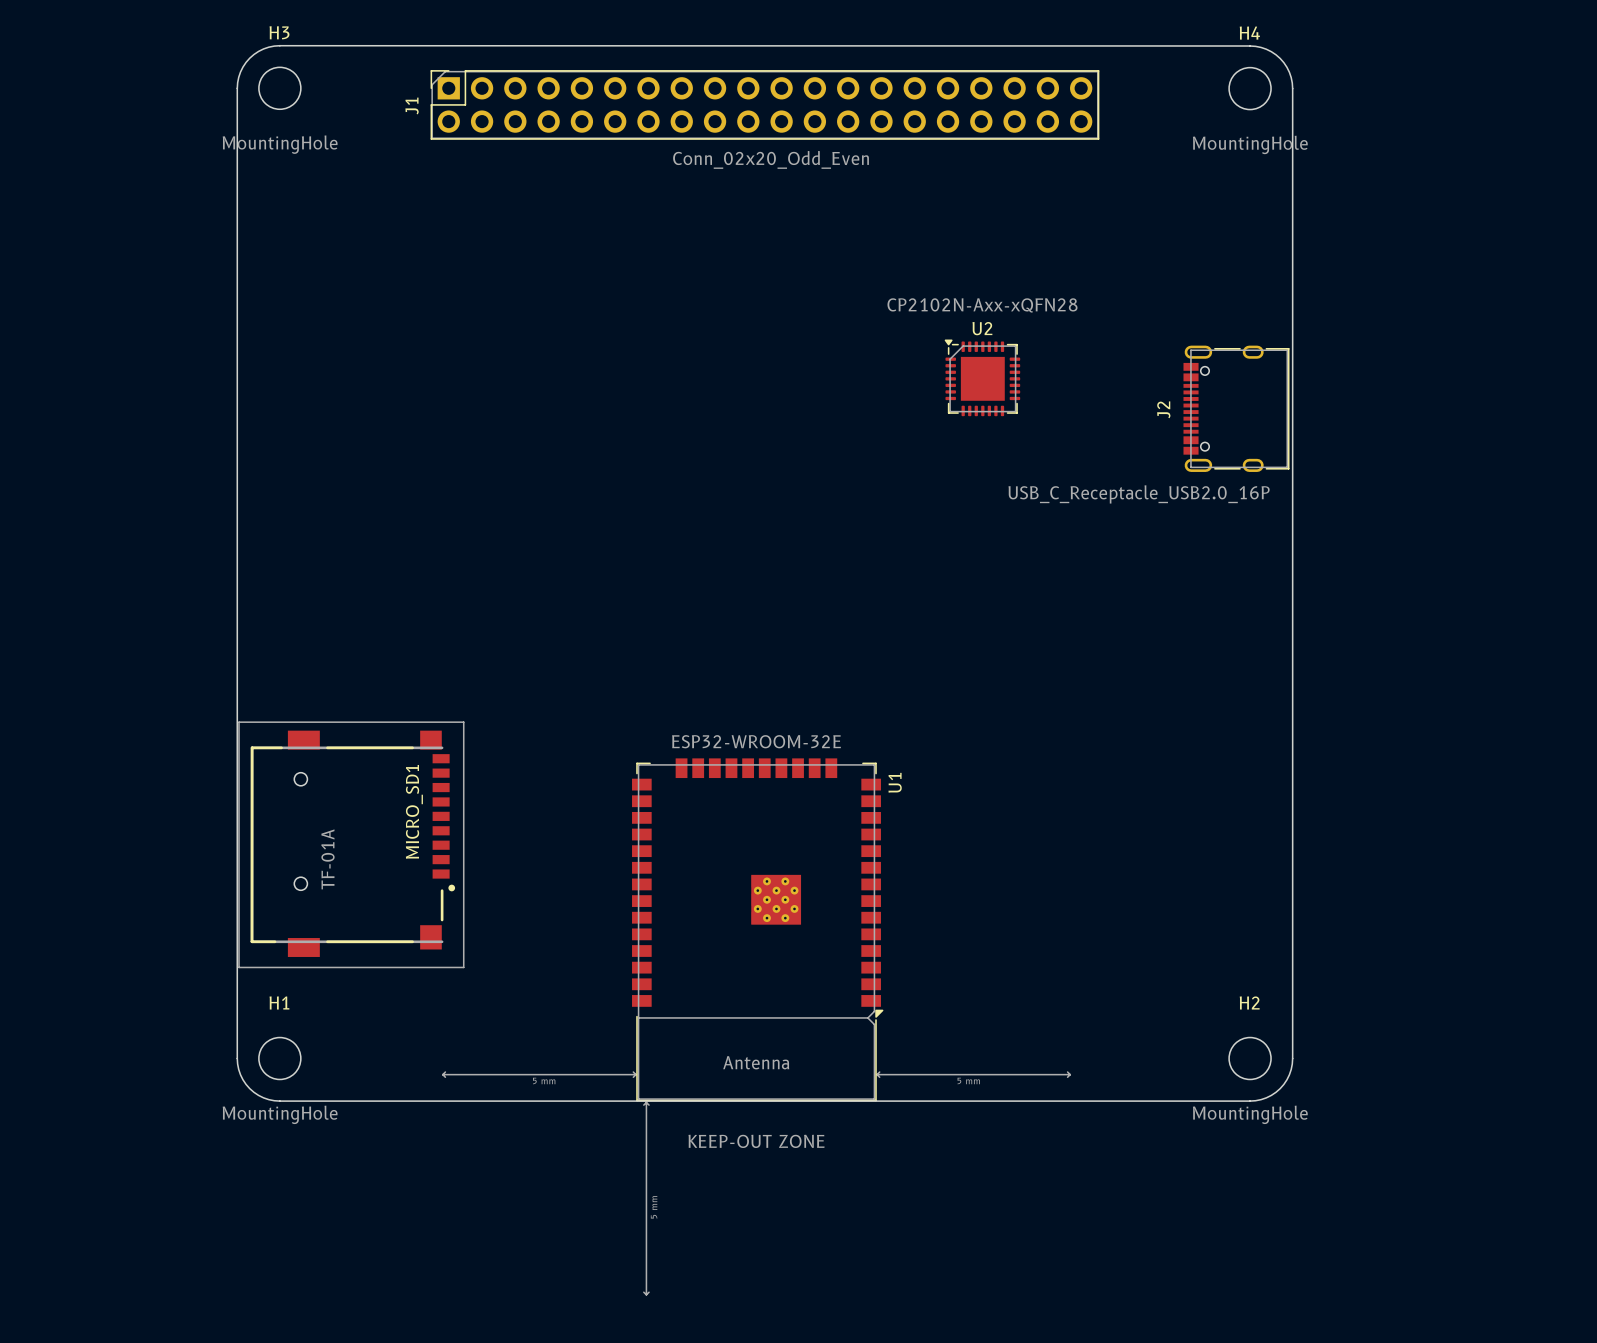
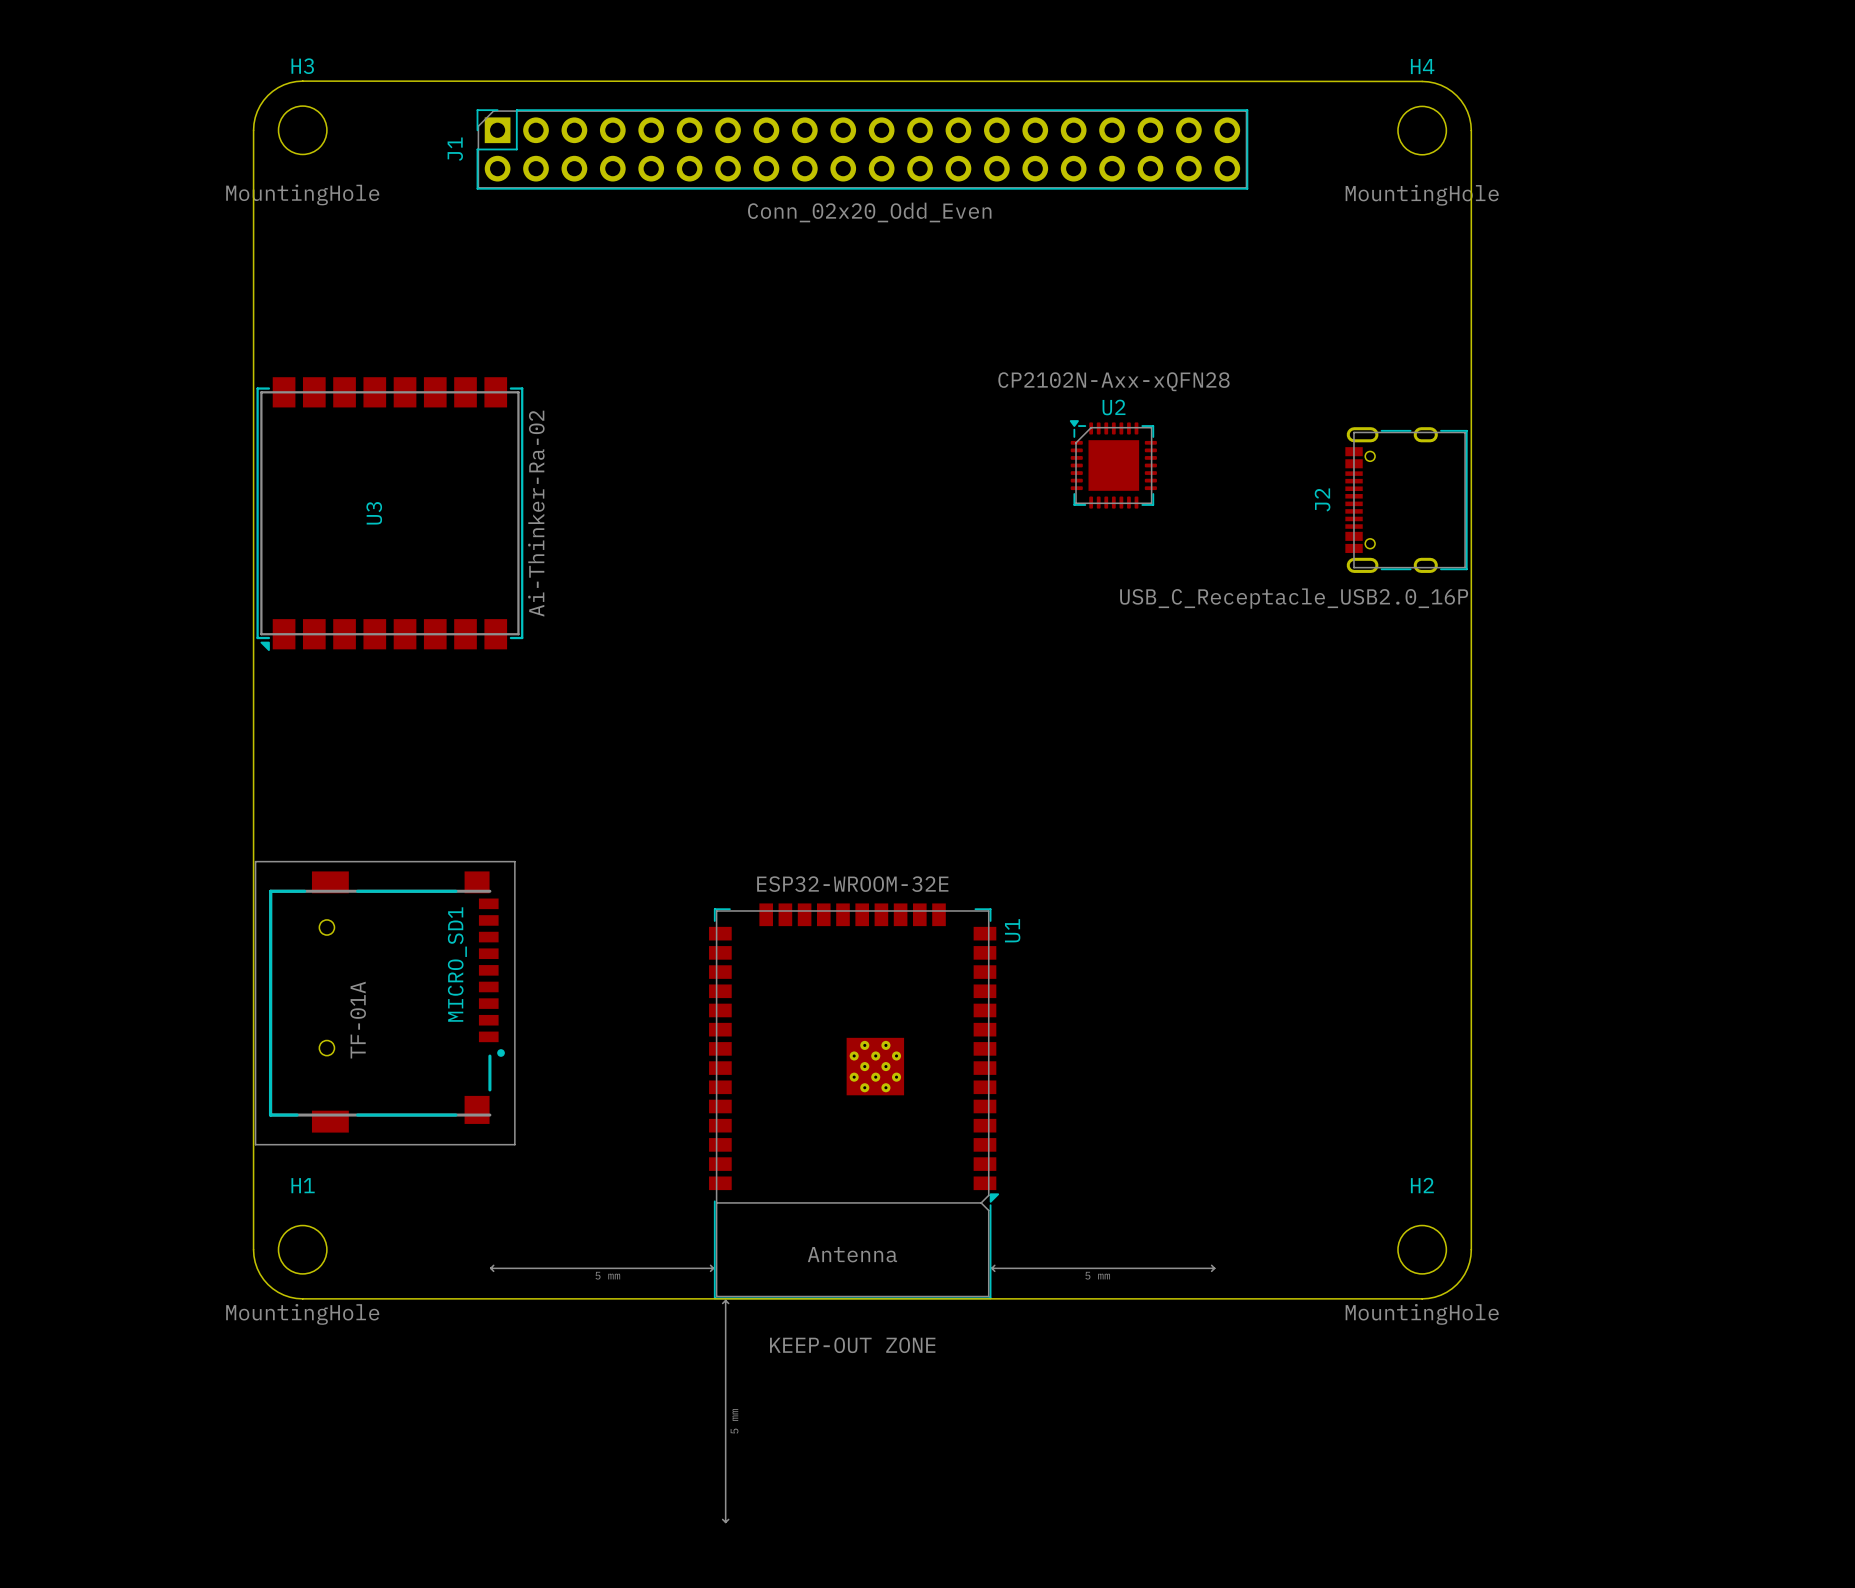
U3: none -> Ai-Thinker-Ra-02 (389, 514)

